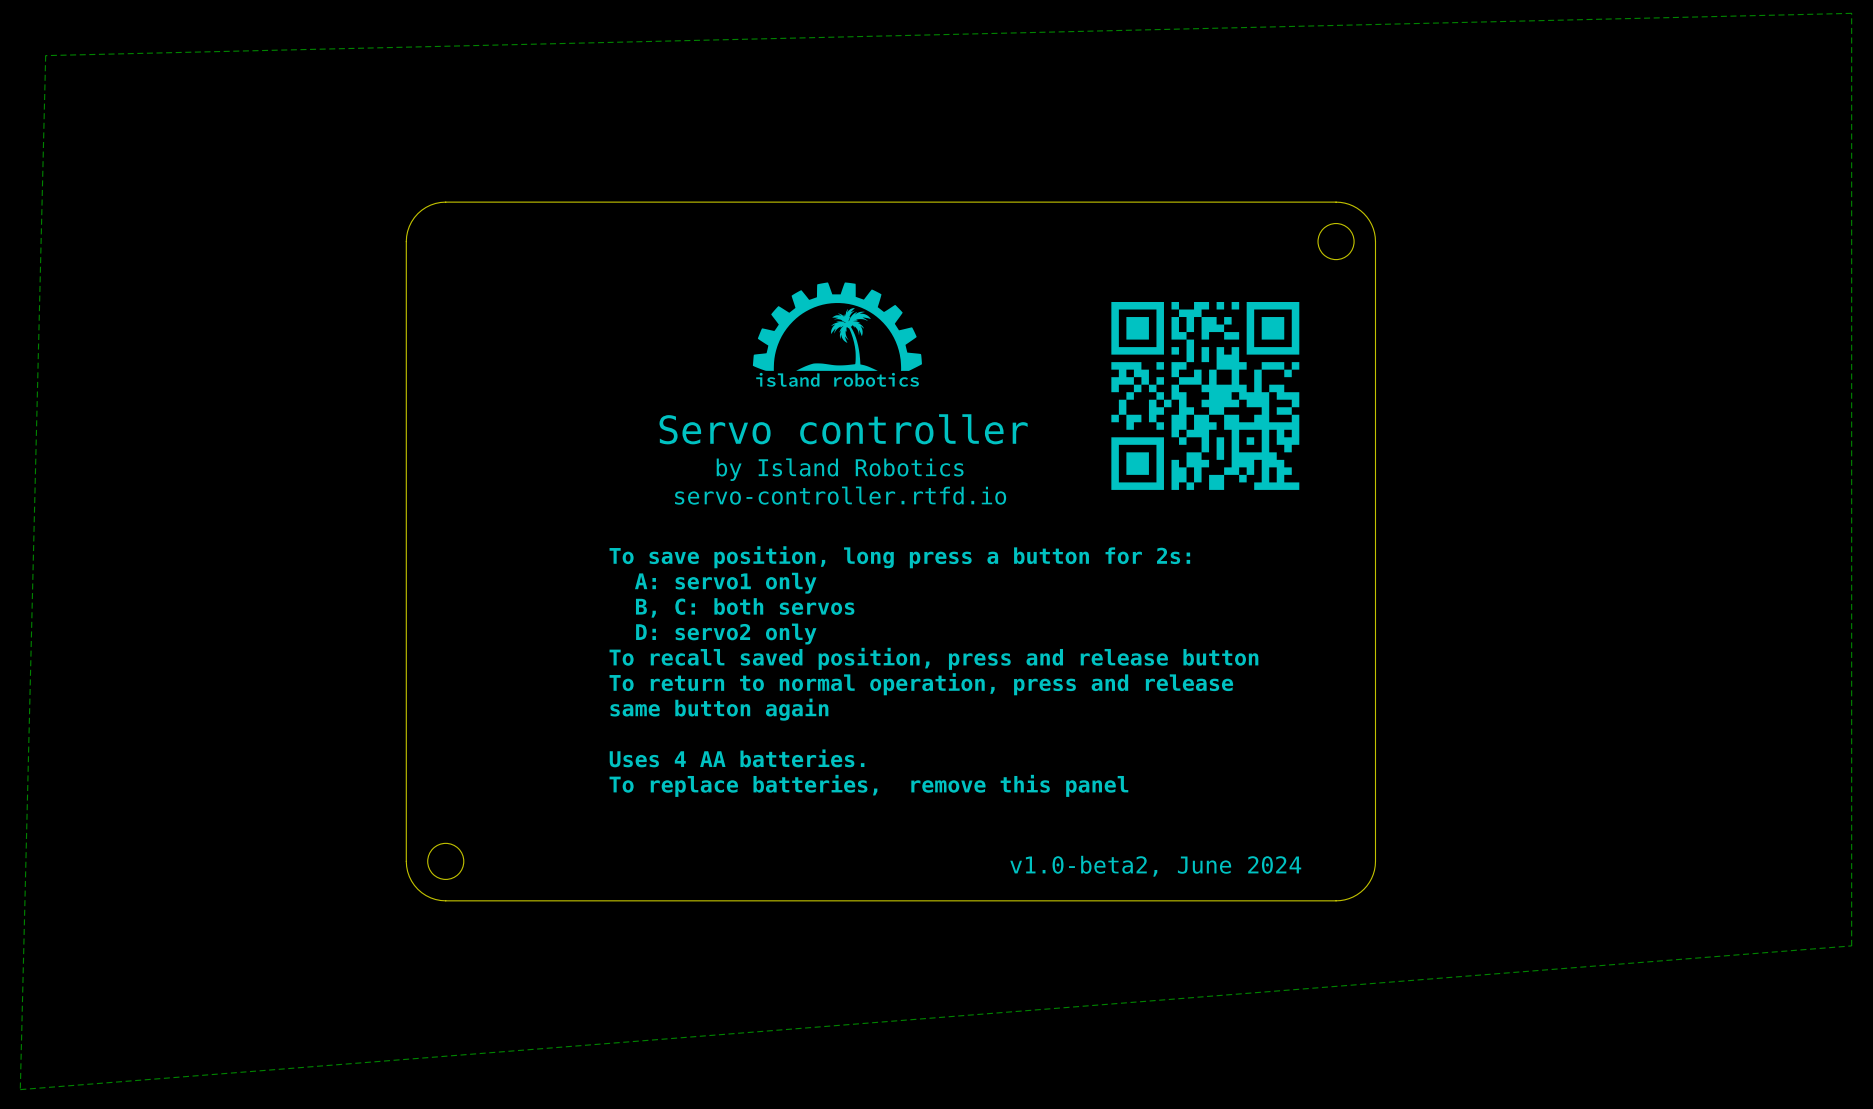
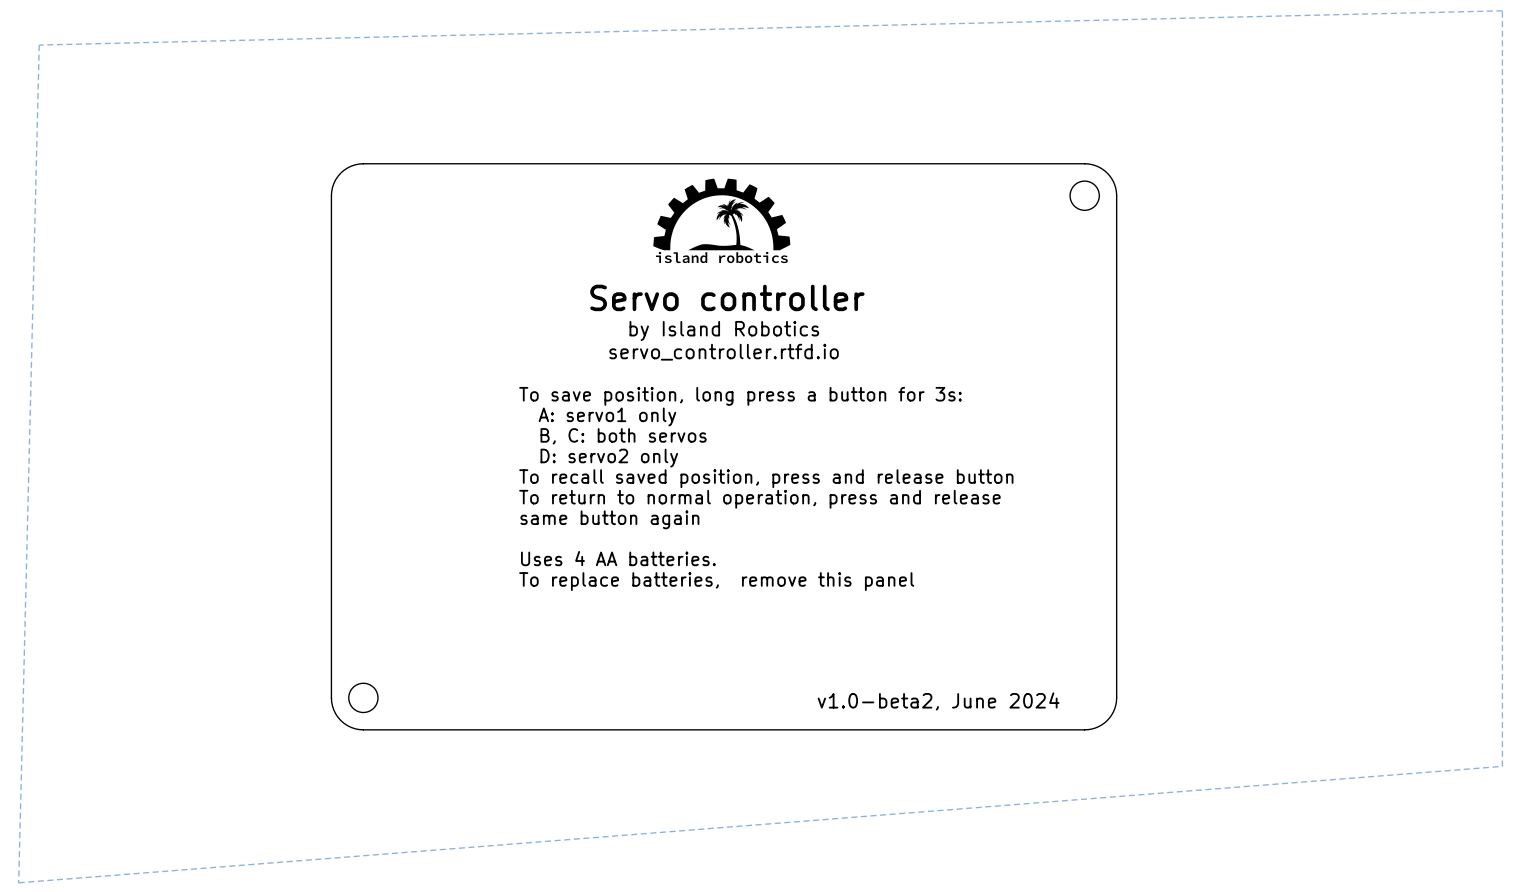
drawing: [1111, 301, 1300, 490] -> none
drawing position: (837, 334) -> (721, 220)
text position: Servo controller (843, 429) -> Servo controller (727, 297)
text: none -> servo_controller.rtfd.io (724, 352)
text position: by Island Robotics (840, 469) -> by Island Robotics (724, 330)
text: none -> To save position, long press a button for 3s: (740, 396)
text: servo-controller.rtfd.io (840, 495) -> none
text: To save position, long press a button for 2s: (899, 557) -> none
text position: A: servo1 only (725, 583) -> A: servo1 only (607, 416)
text position: B, C: both servos (745, 607) -> B, C: both servos (623, 436)
text position: D: servo2 only (726, 634) -> D: servo2 only (609, 458)
text position: To recall saved position, press and release button (933, 658) -> To recall saved position, press and release button (766, 478)
text position: To return to normal operation, press and release (921, 684) -> To return to normal operation, press and release (759, 499)
text position: same button again (719, 709) -> same button again (609, 519)
text position: Uses 4 AA batteries. (737, 758) -> Uses 4 AA batteries. (618, 558)
text position: To replace batteries, remove this panel (868, 785) -> To replace batteries, remove this panel (716, 581)

